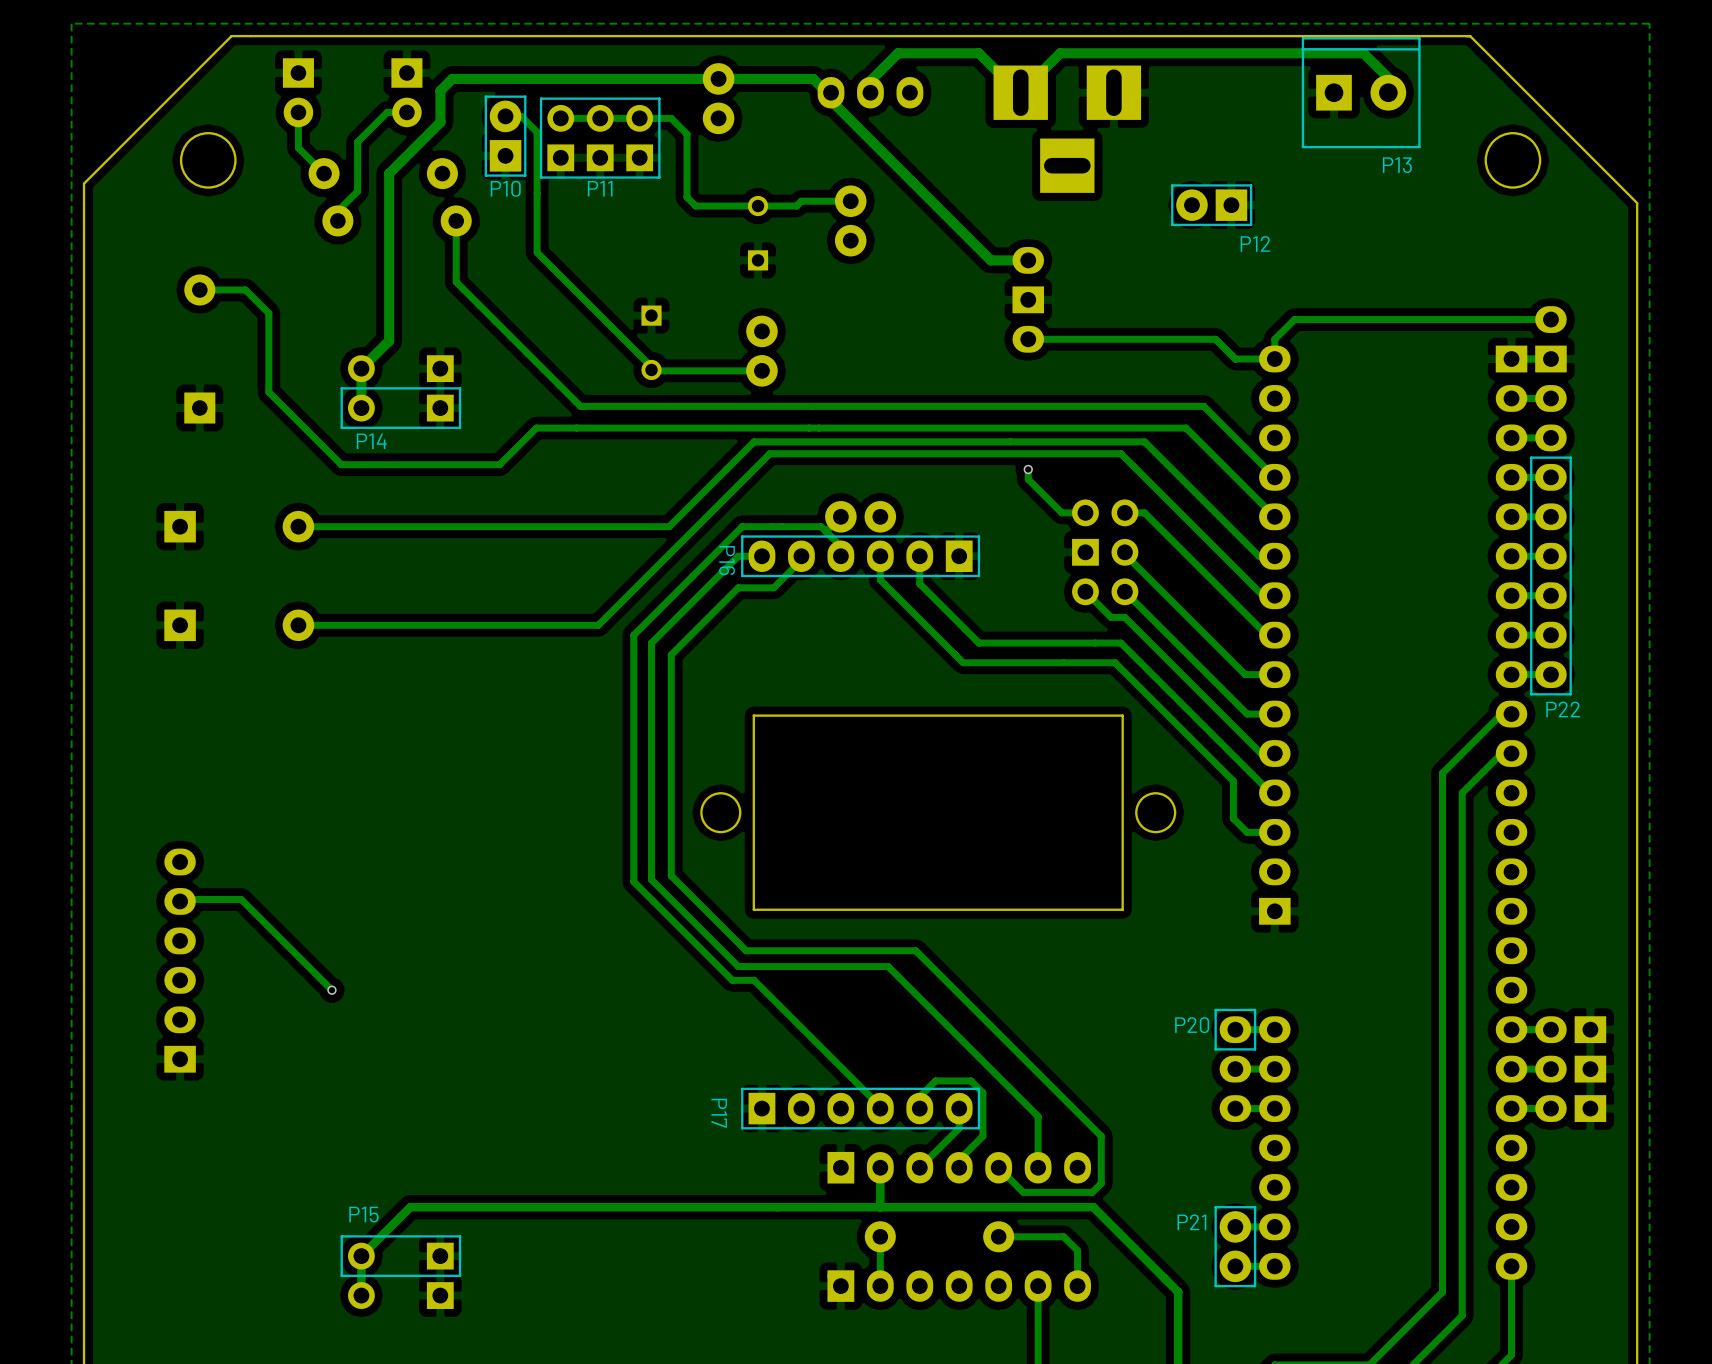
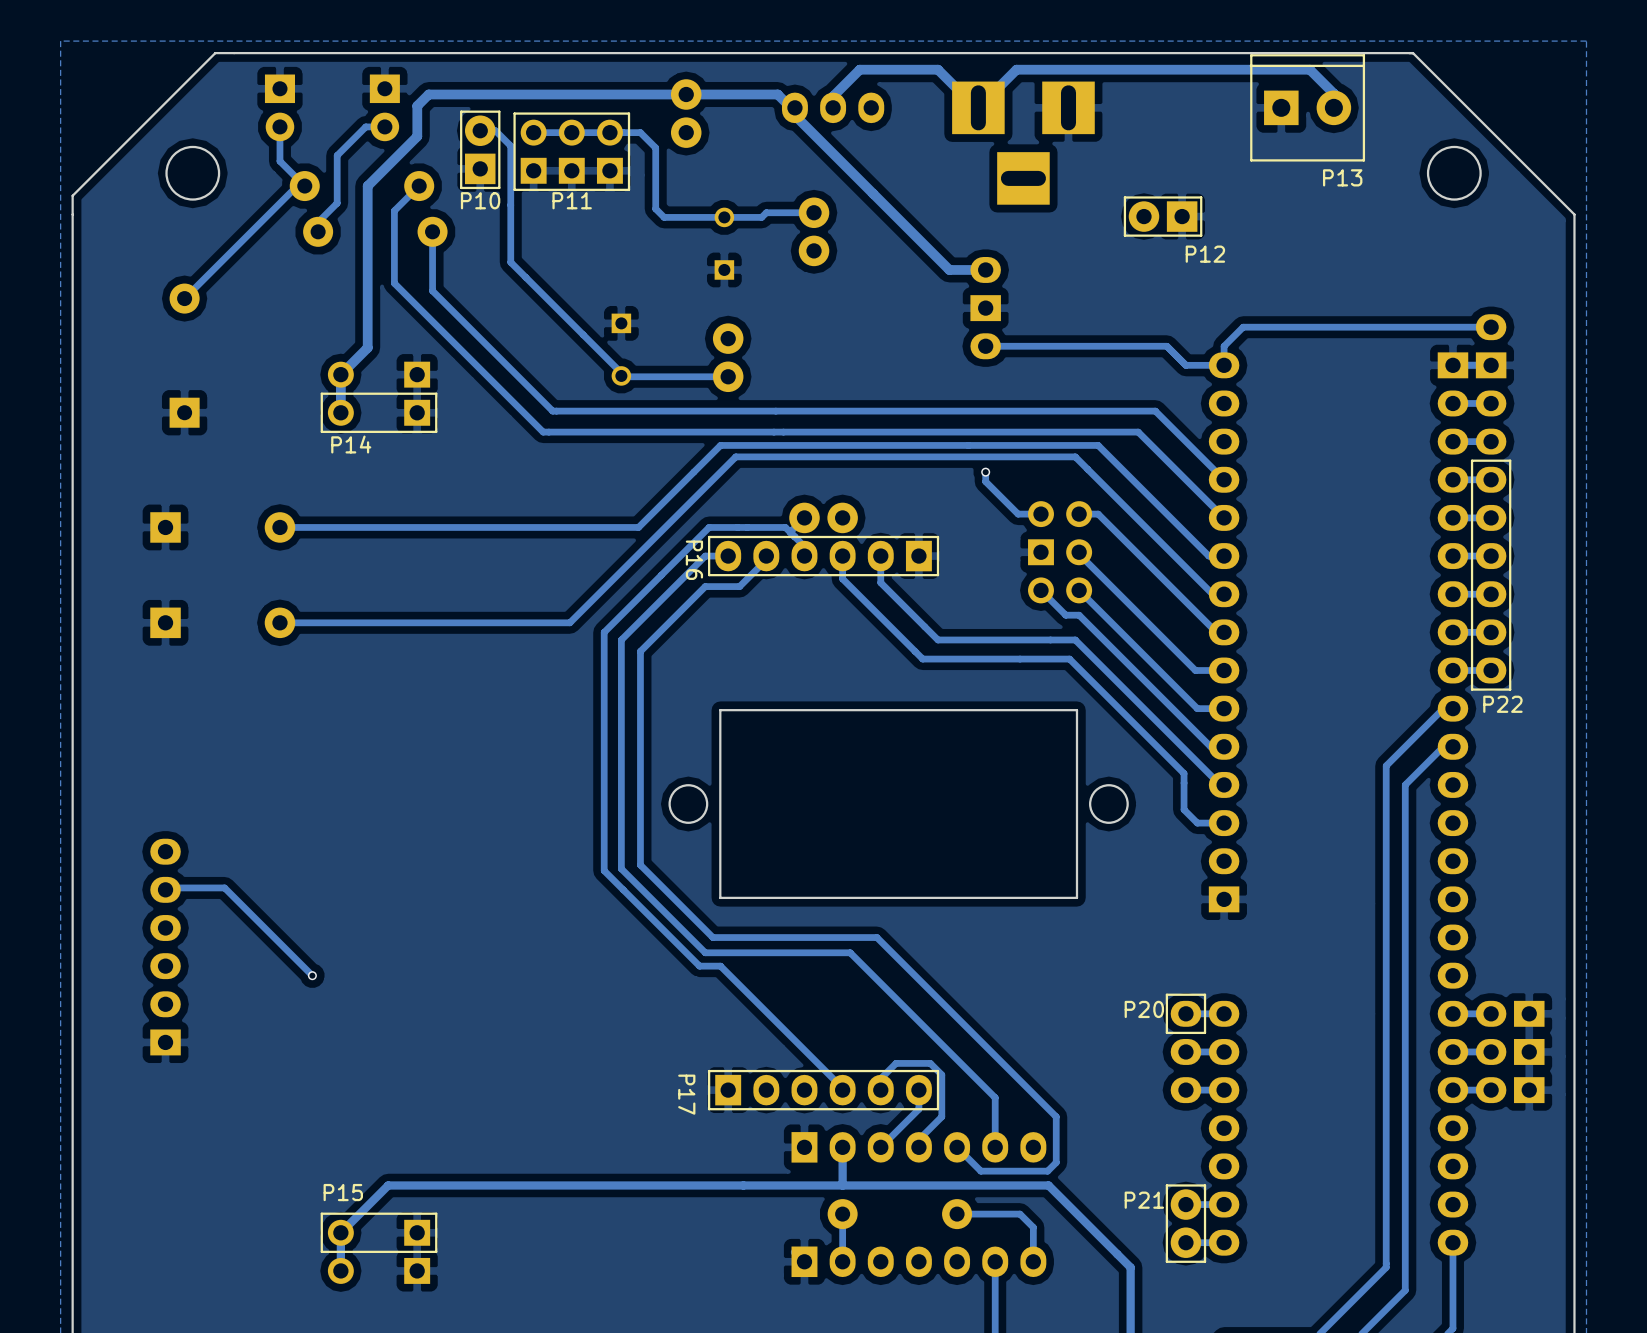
track: none -> (297, 186) (184, 298)
track: (199, 289) (245, 289) (268, 313) (268, 392) (341, 464) (499, 464) (536, 428) (570, 428) -> (419, 186) (394, 210) (394, 283) (543, 432)

